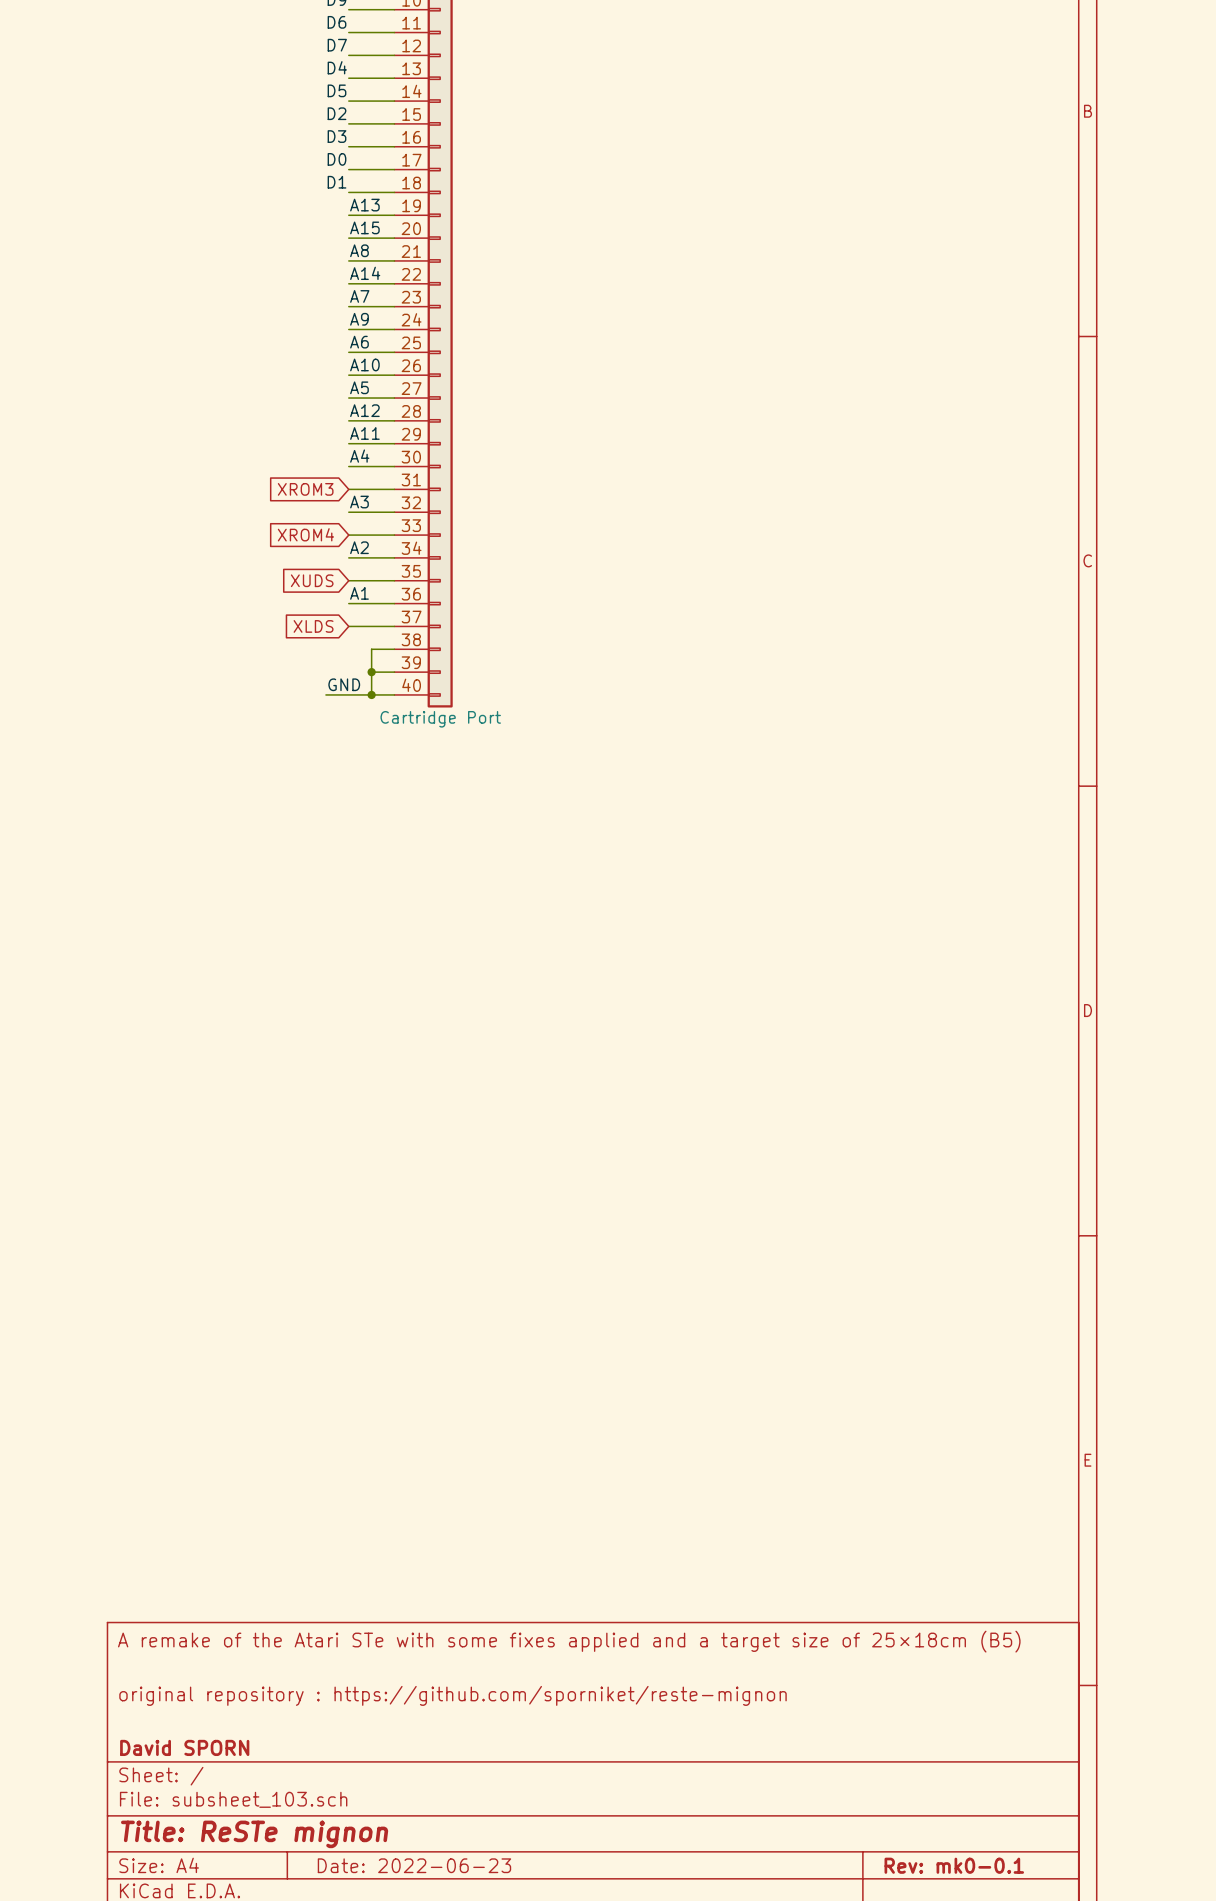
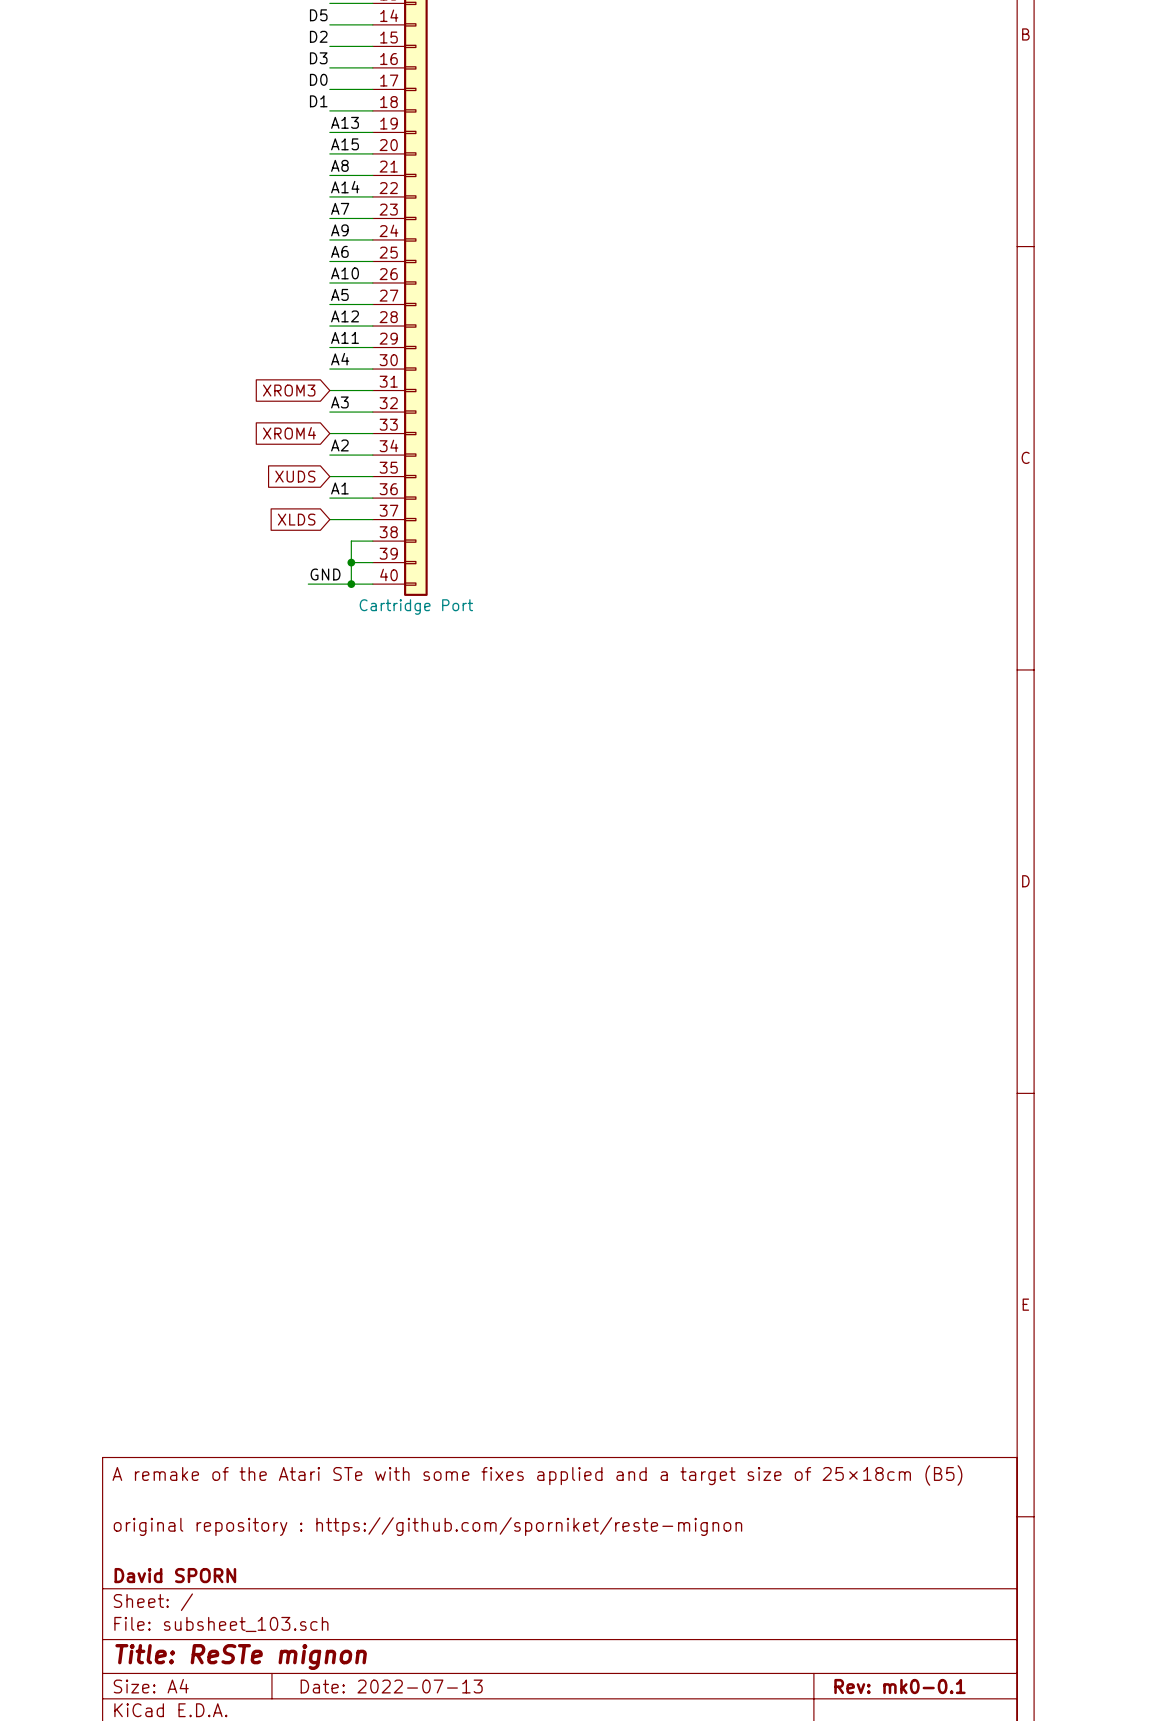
title block: Date: 2022-06-23 (414, 1865) -> Date: 2022-07-13 (391, 1686)

